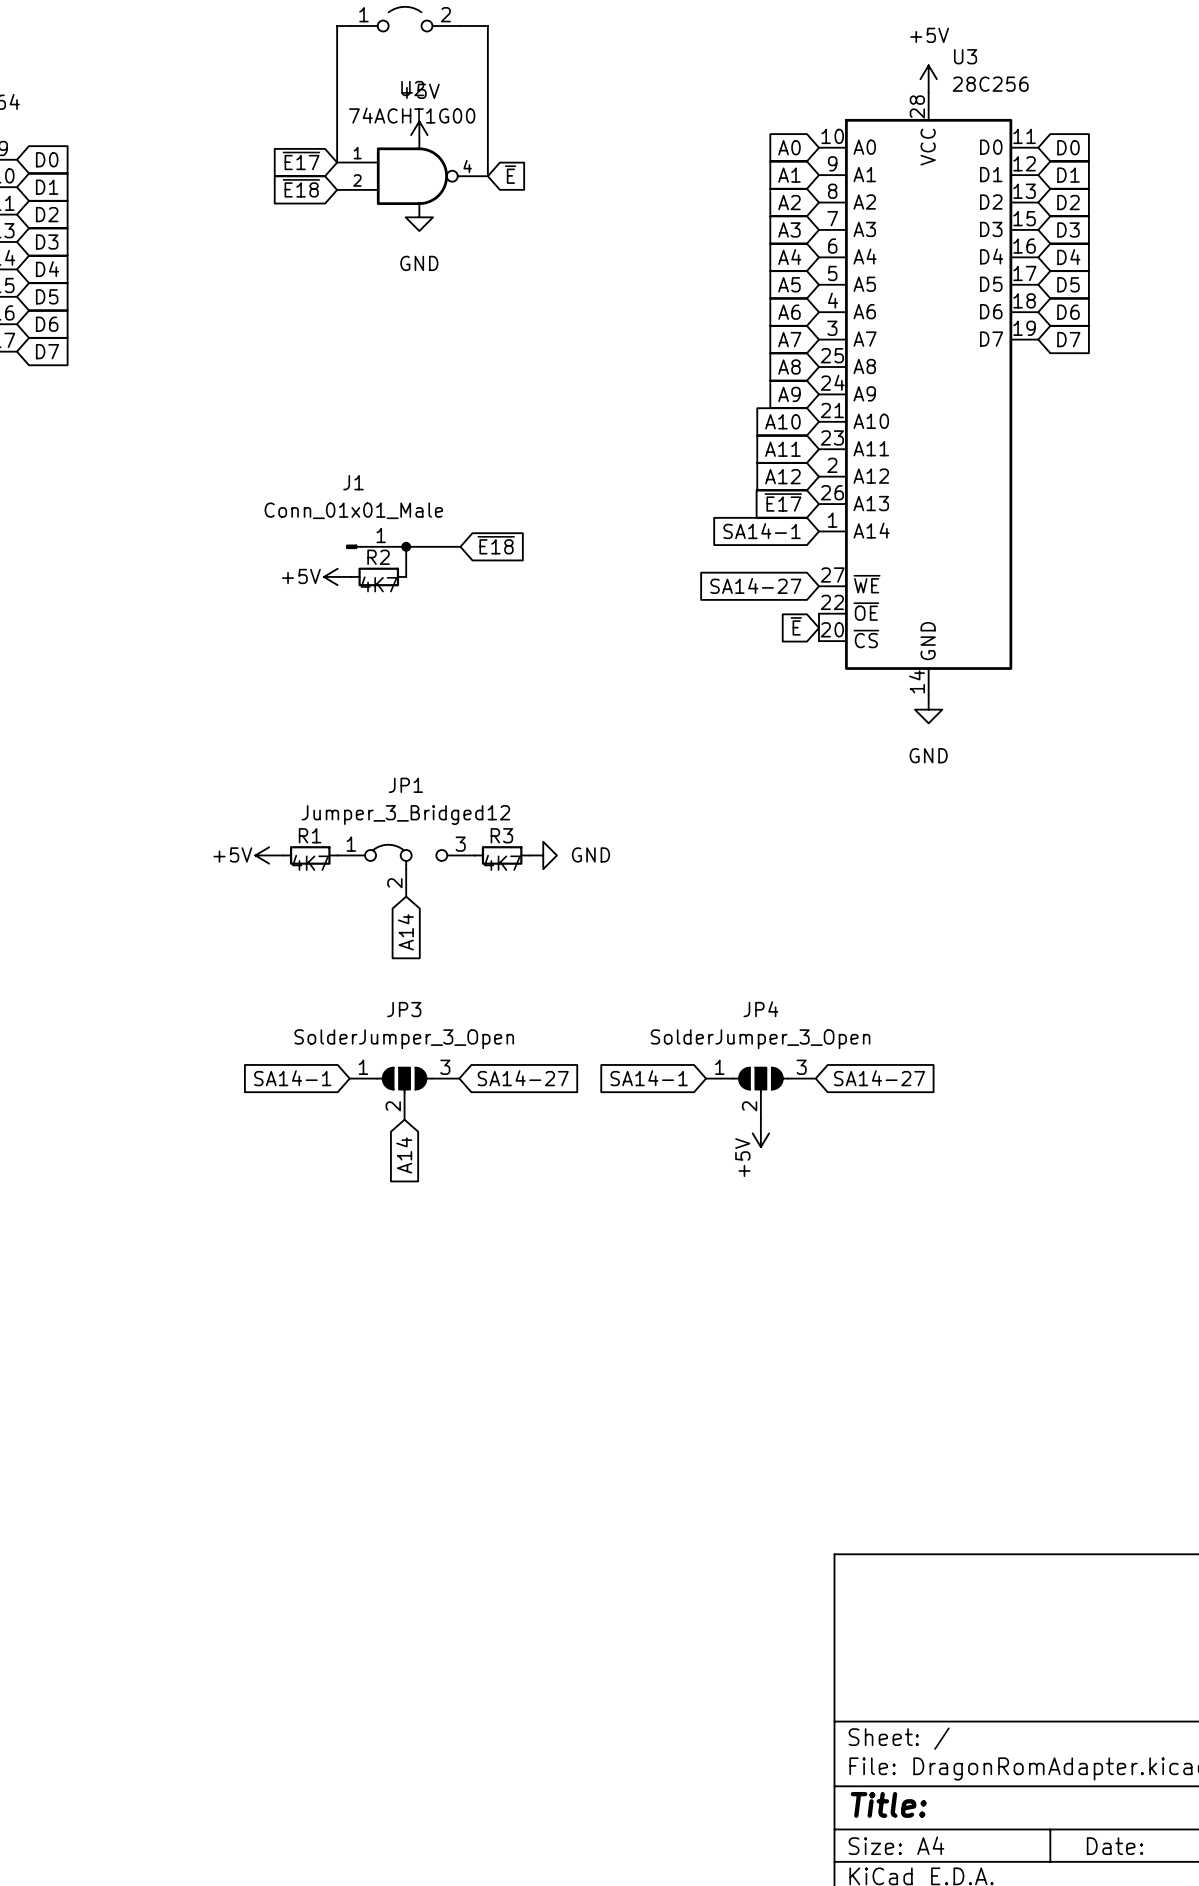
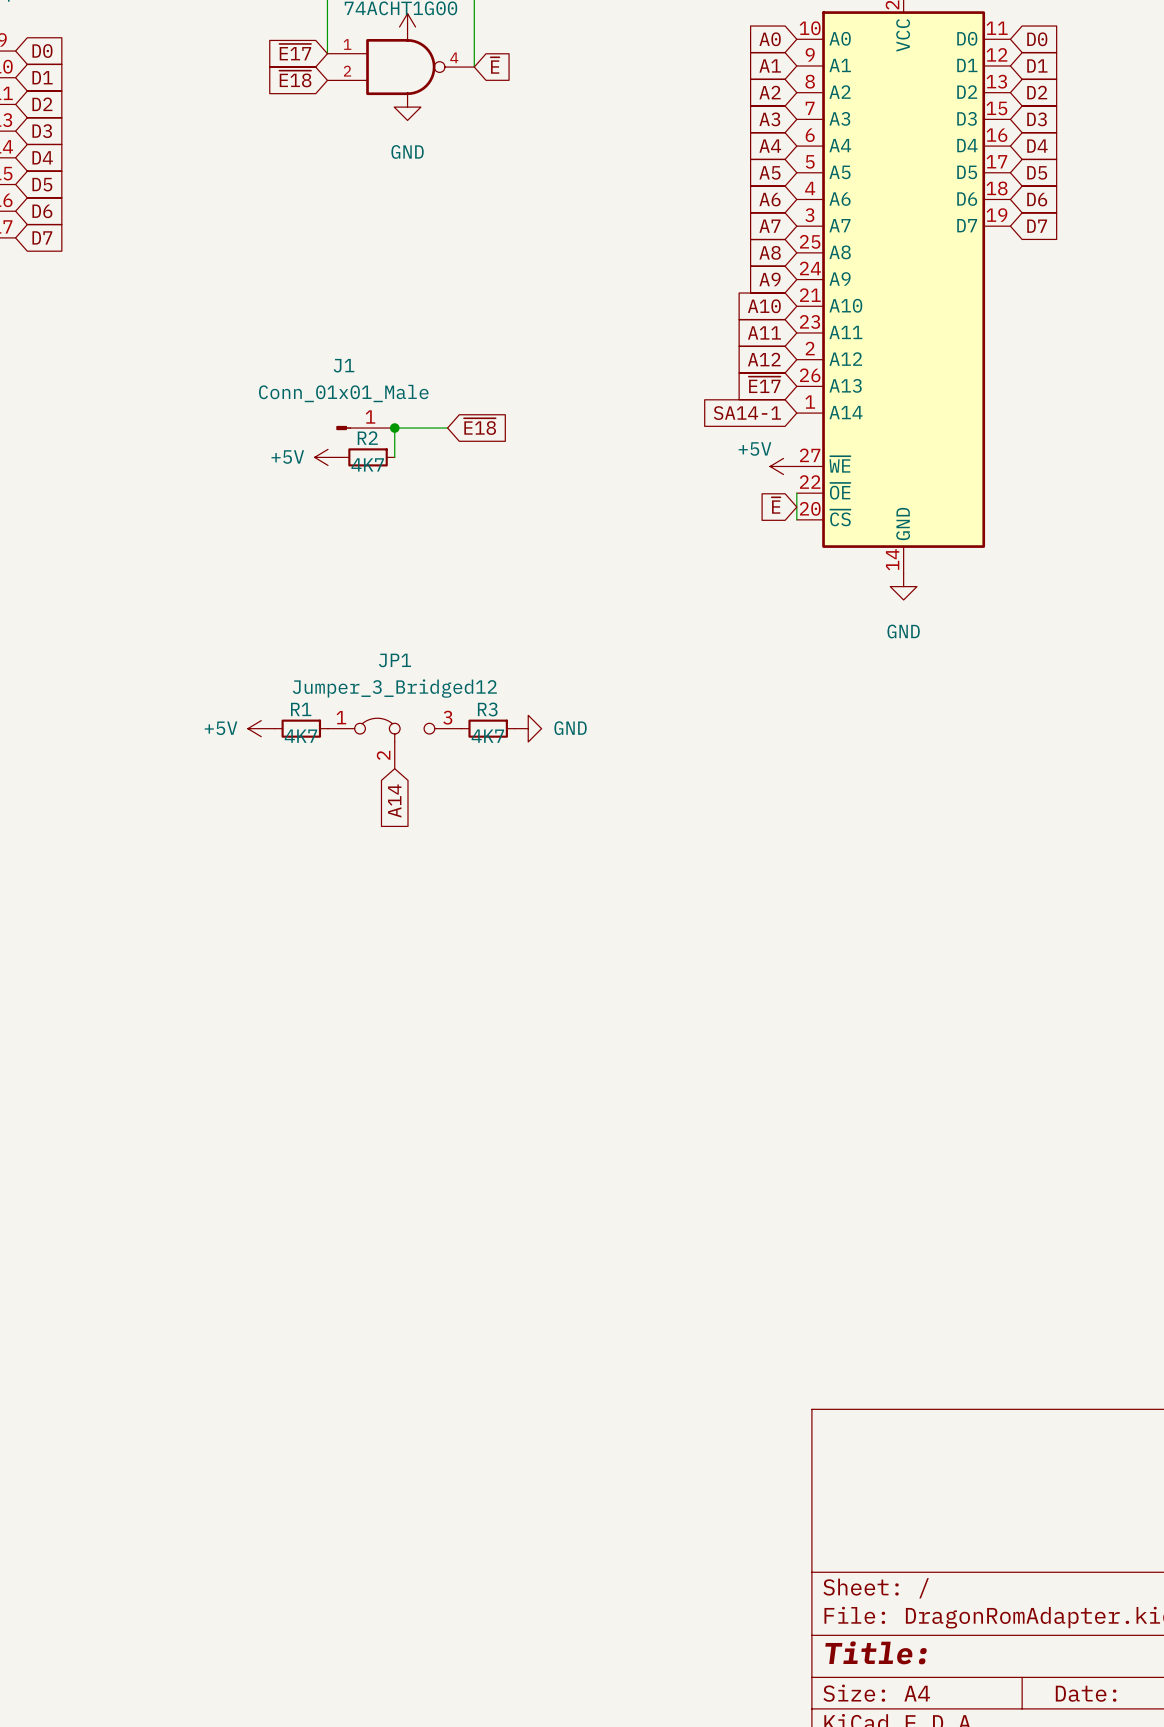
global label: SA14-27 (755, 585) -> none
power symbol: none -> +5V (783, 466)
global label: SA14-1 (292, 1078) -> none
global label: SA14-27 (523, 1078) -> none
global label: SA14-1 (649, 1078) -> none
global label: SA14-27 (879, 1078) -> none
JP3: SolderJumper_3_Open (404, 1093) -> none
JP4: SolderJumper_3_Open (760, 1093) -> none
power symbol: +5V (760, 1133) -> none
global label: A14 (404, 1155) -> none

